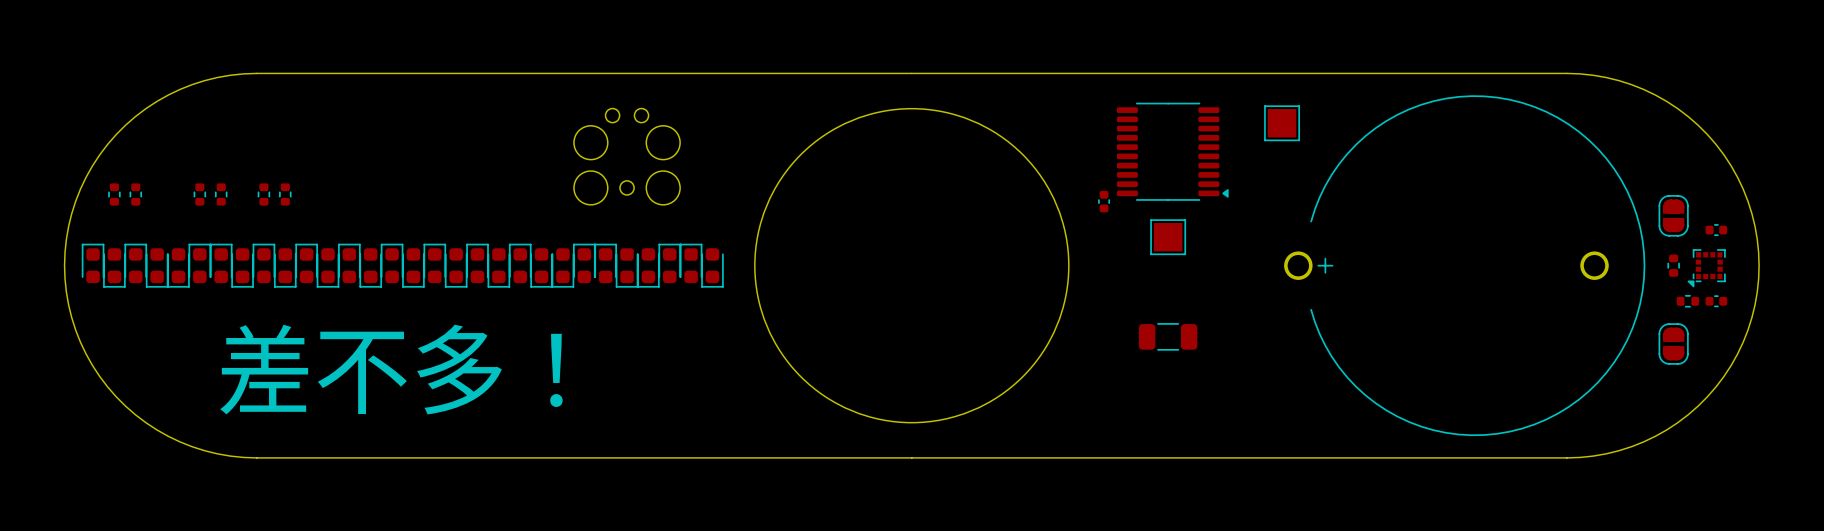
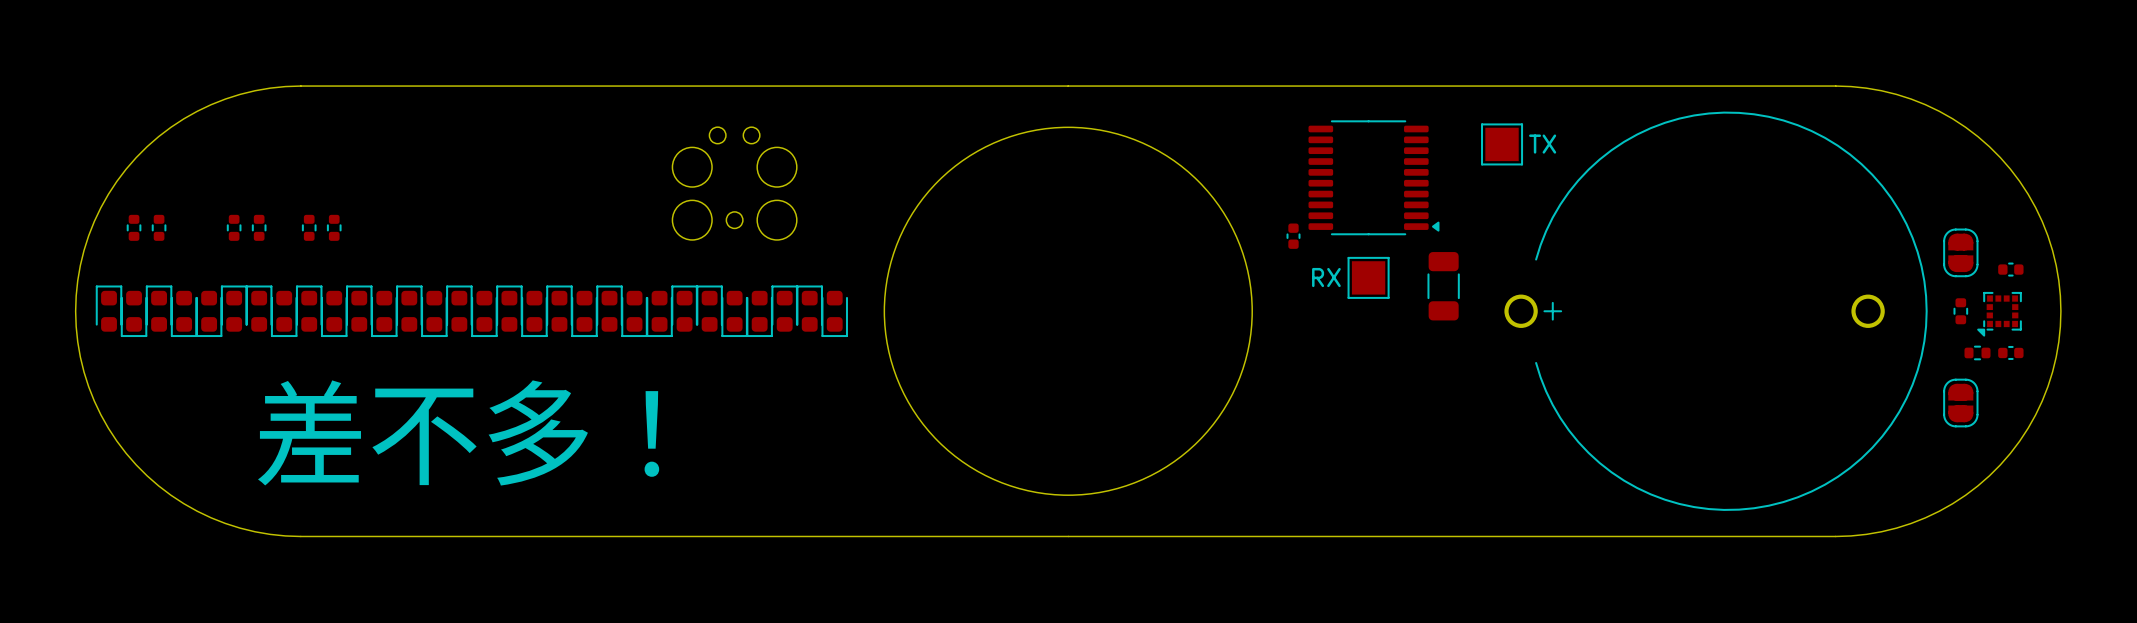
text: none -> TX (1542, 144)
text: none -> RX (1326, 277)
part rotation: 0° (1168, 336) -> 90° clockwise (1443, 286)
part position: (1168, 336) -> (1443, 286)

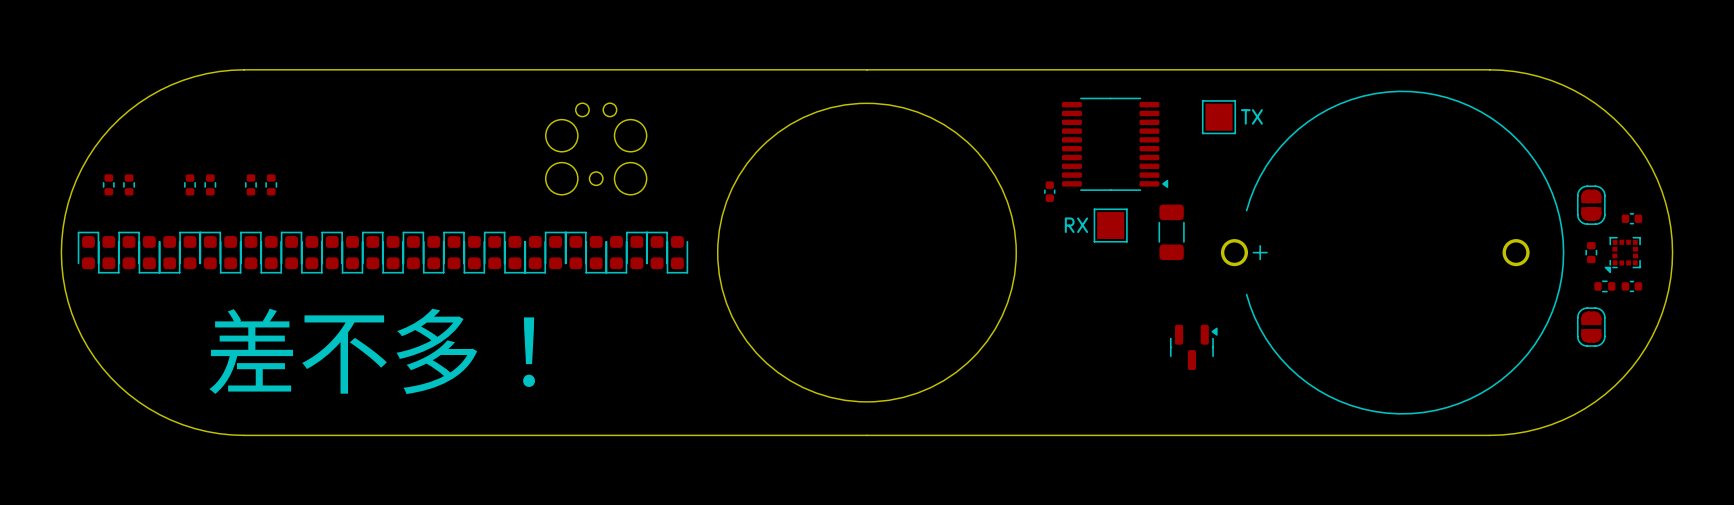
part: none -> (1193, 347)

